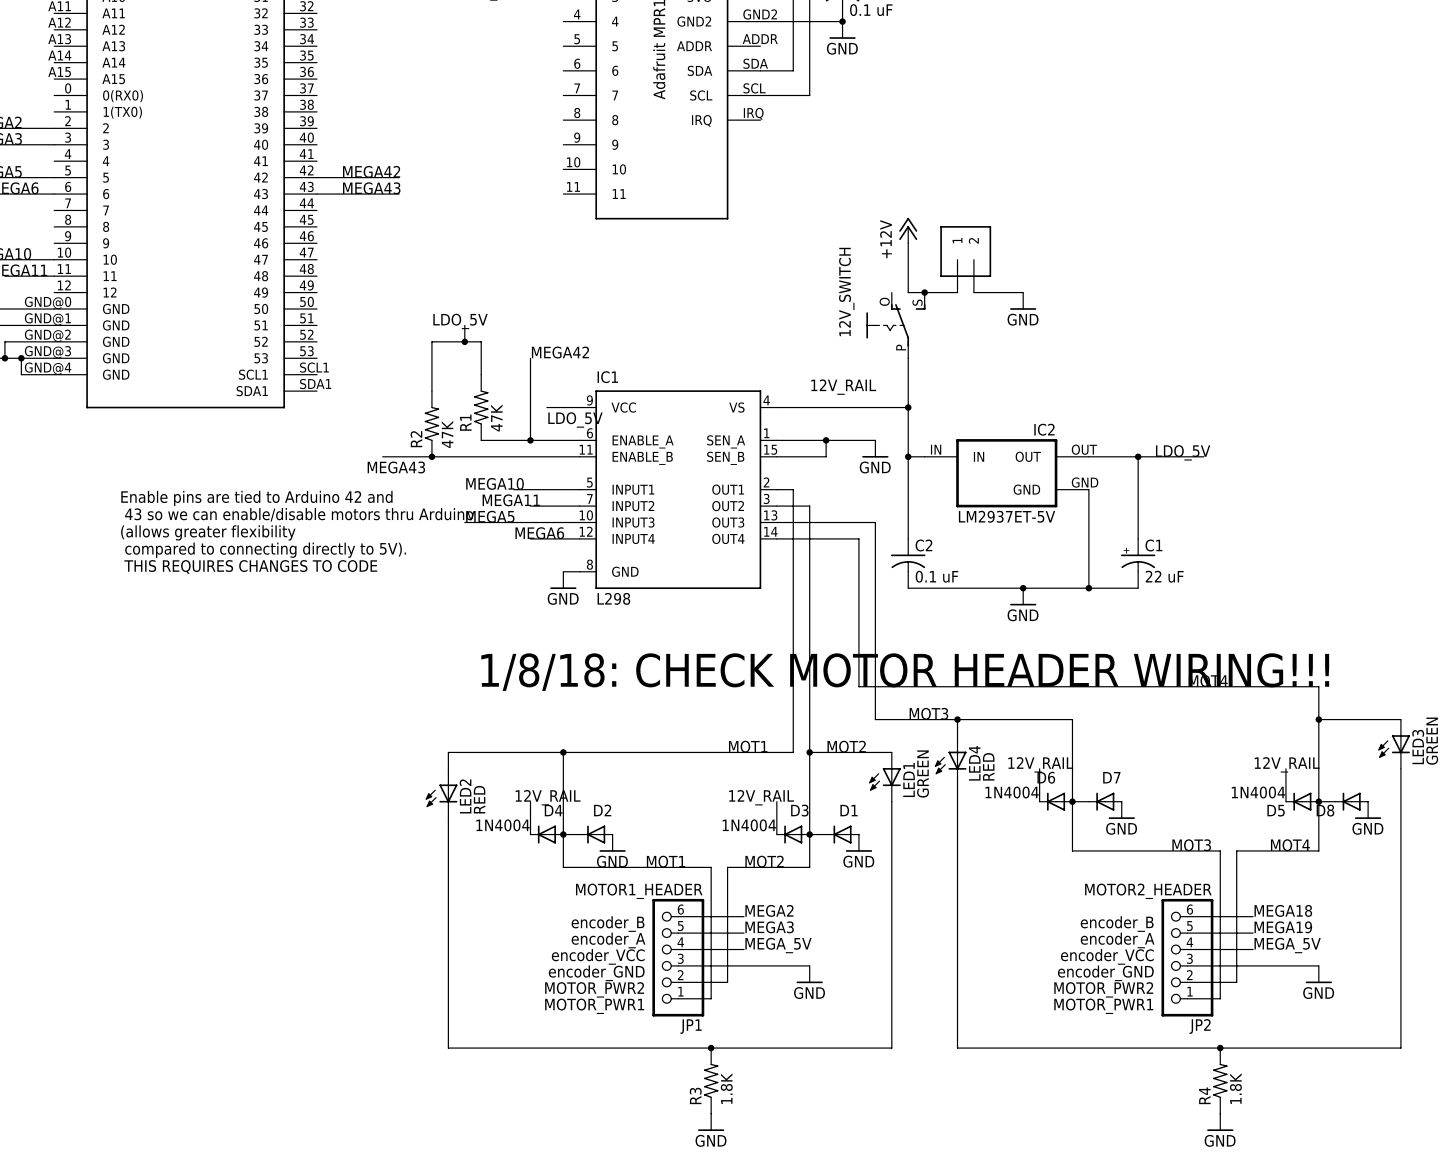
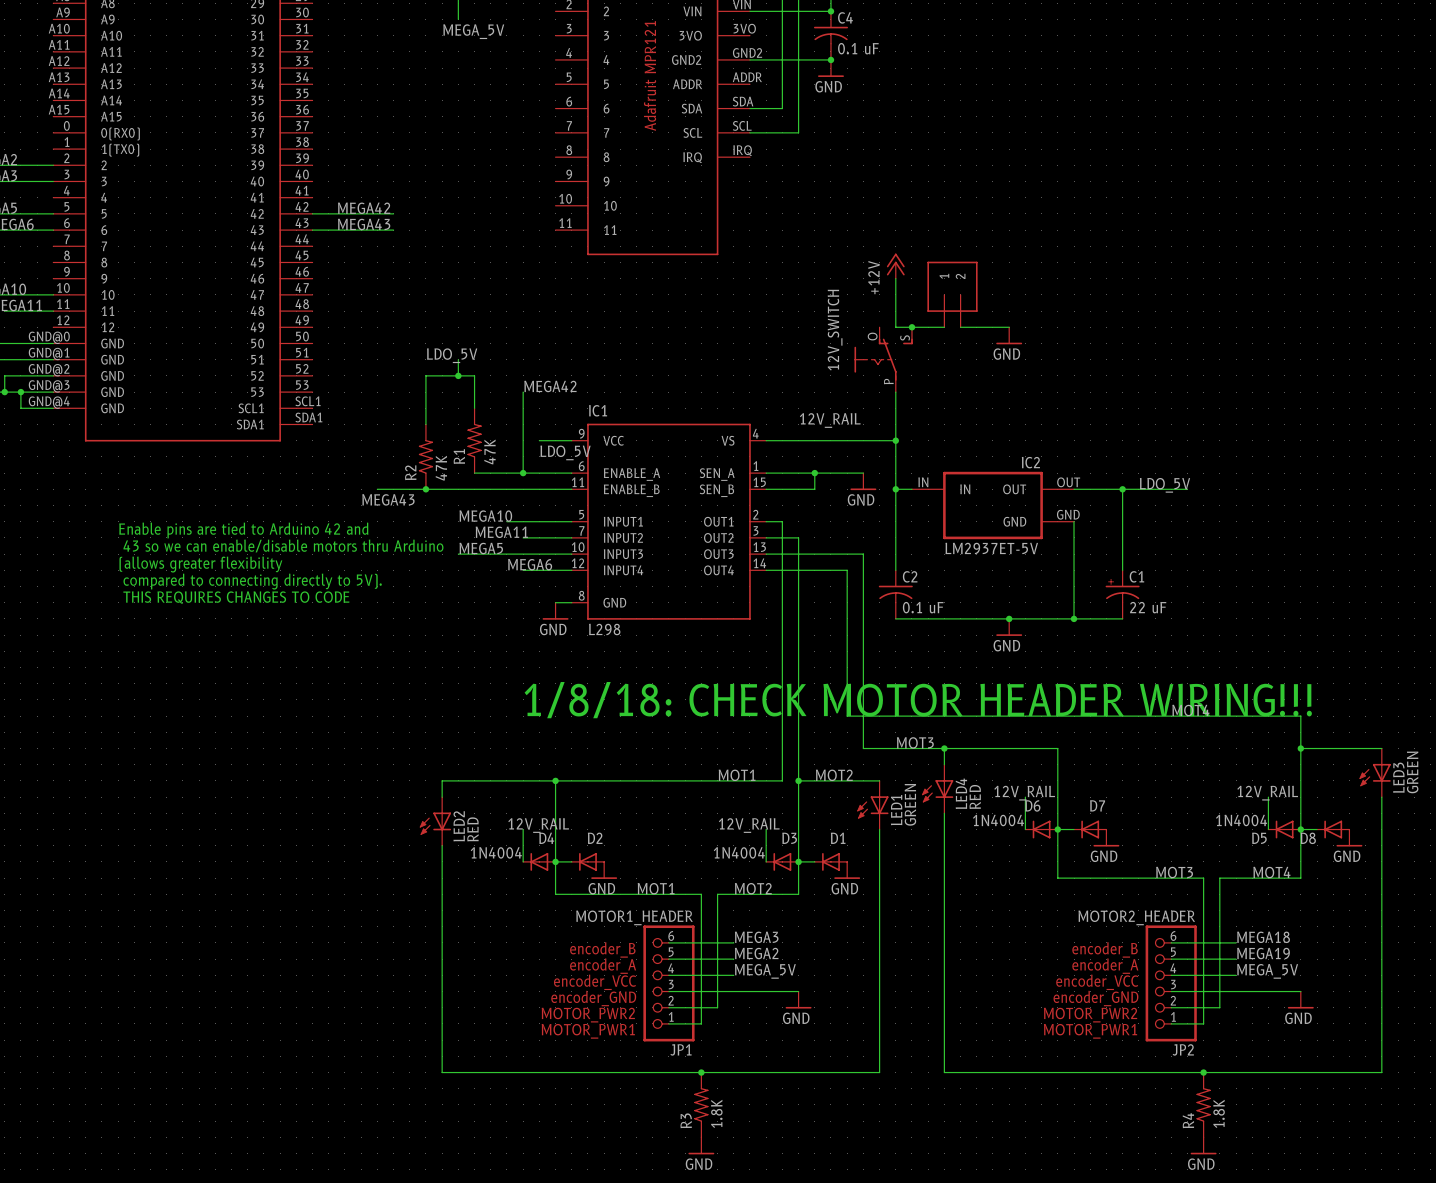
label: MEGA2 (769, 910) -> MEGA3 (756, 937)
label: MEGA3 (769, 927) -> MEGA2 (756, 953)

